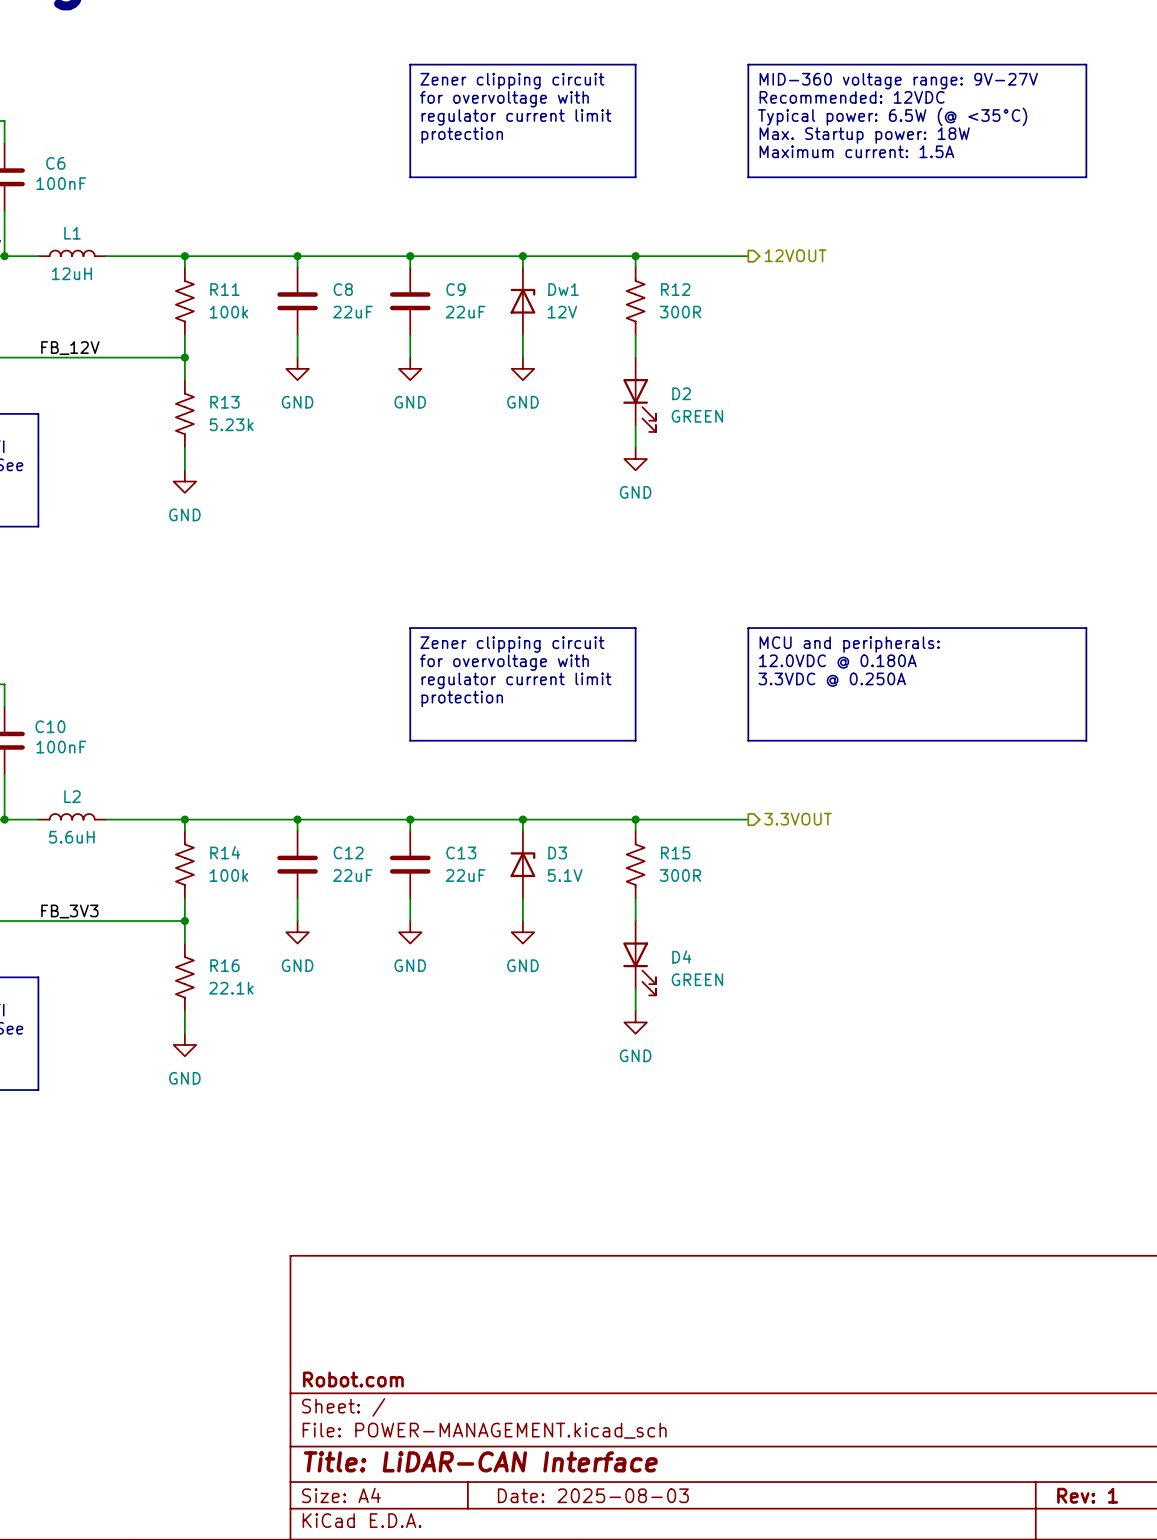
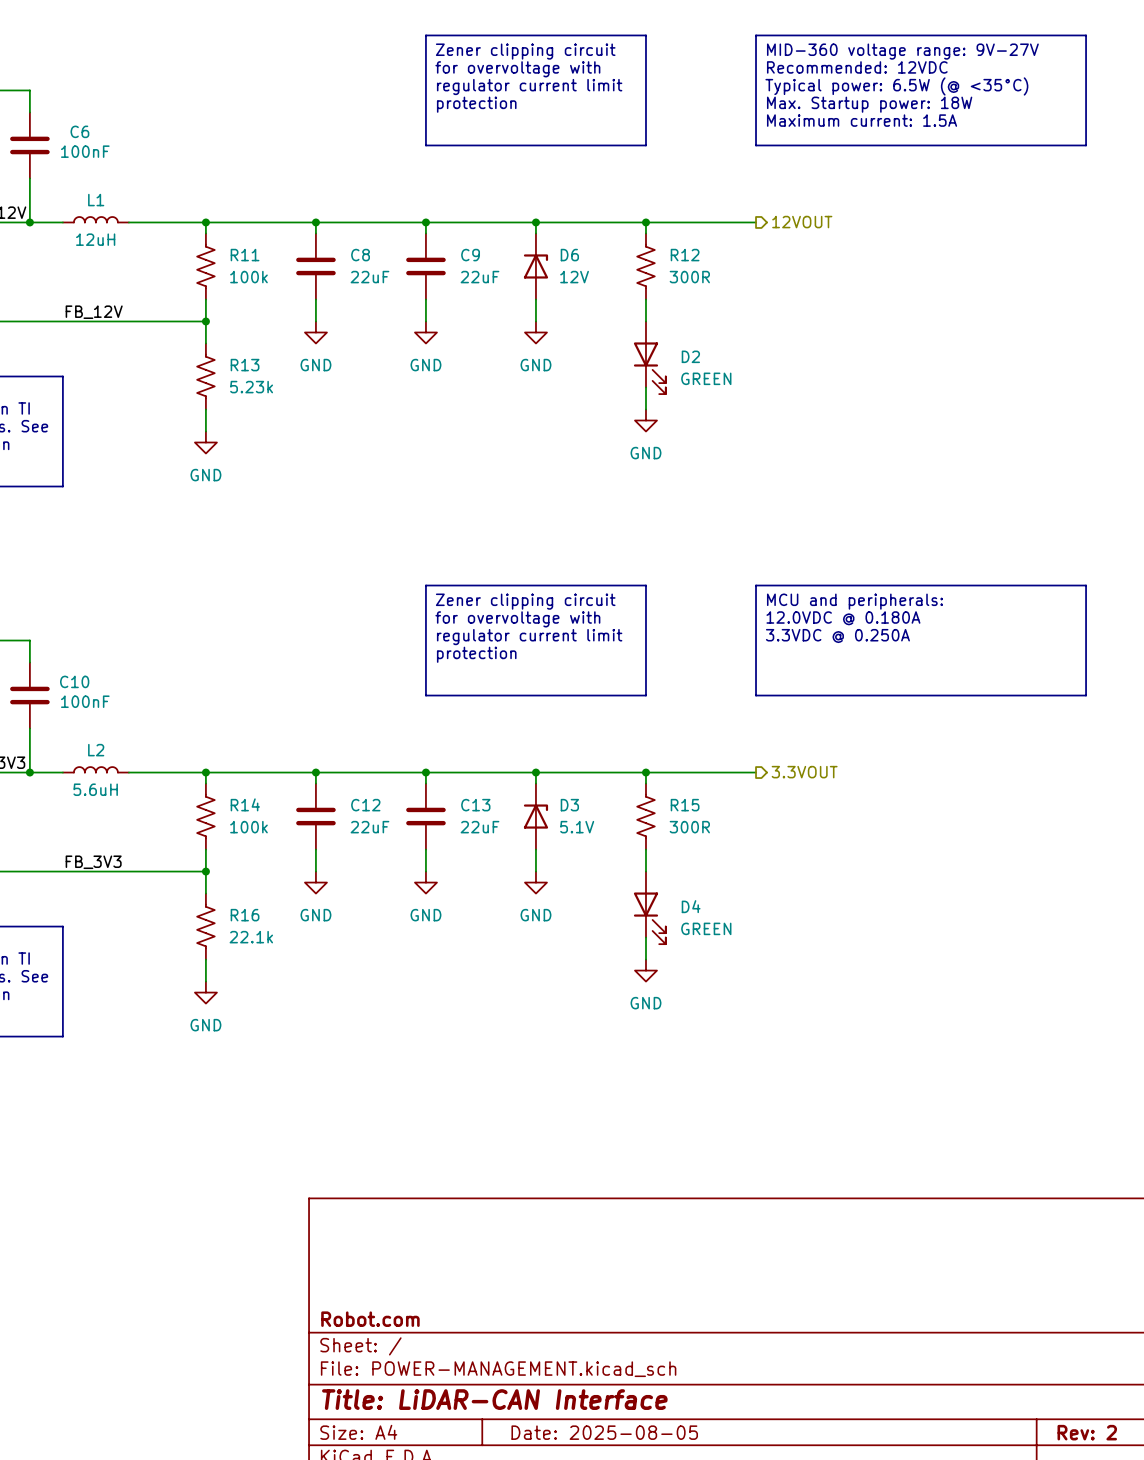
Dw1 name: Dw1 (563, 289) -> D6 (569, 255)
title block: Date: 2025-08-03 (593, 1495) -> Date: 2025-08-05 (604, 1432)
title block: Rev: 1 (1087, 1495) -> Rev: 2 (1087, 1432)

